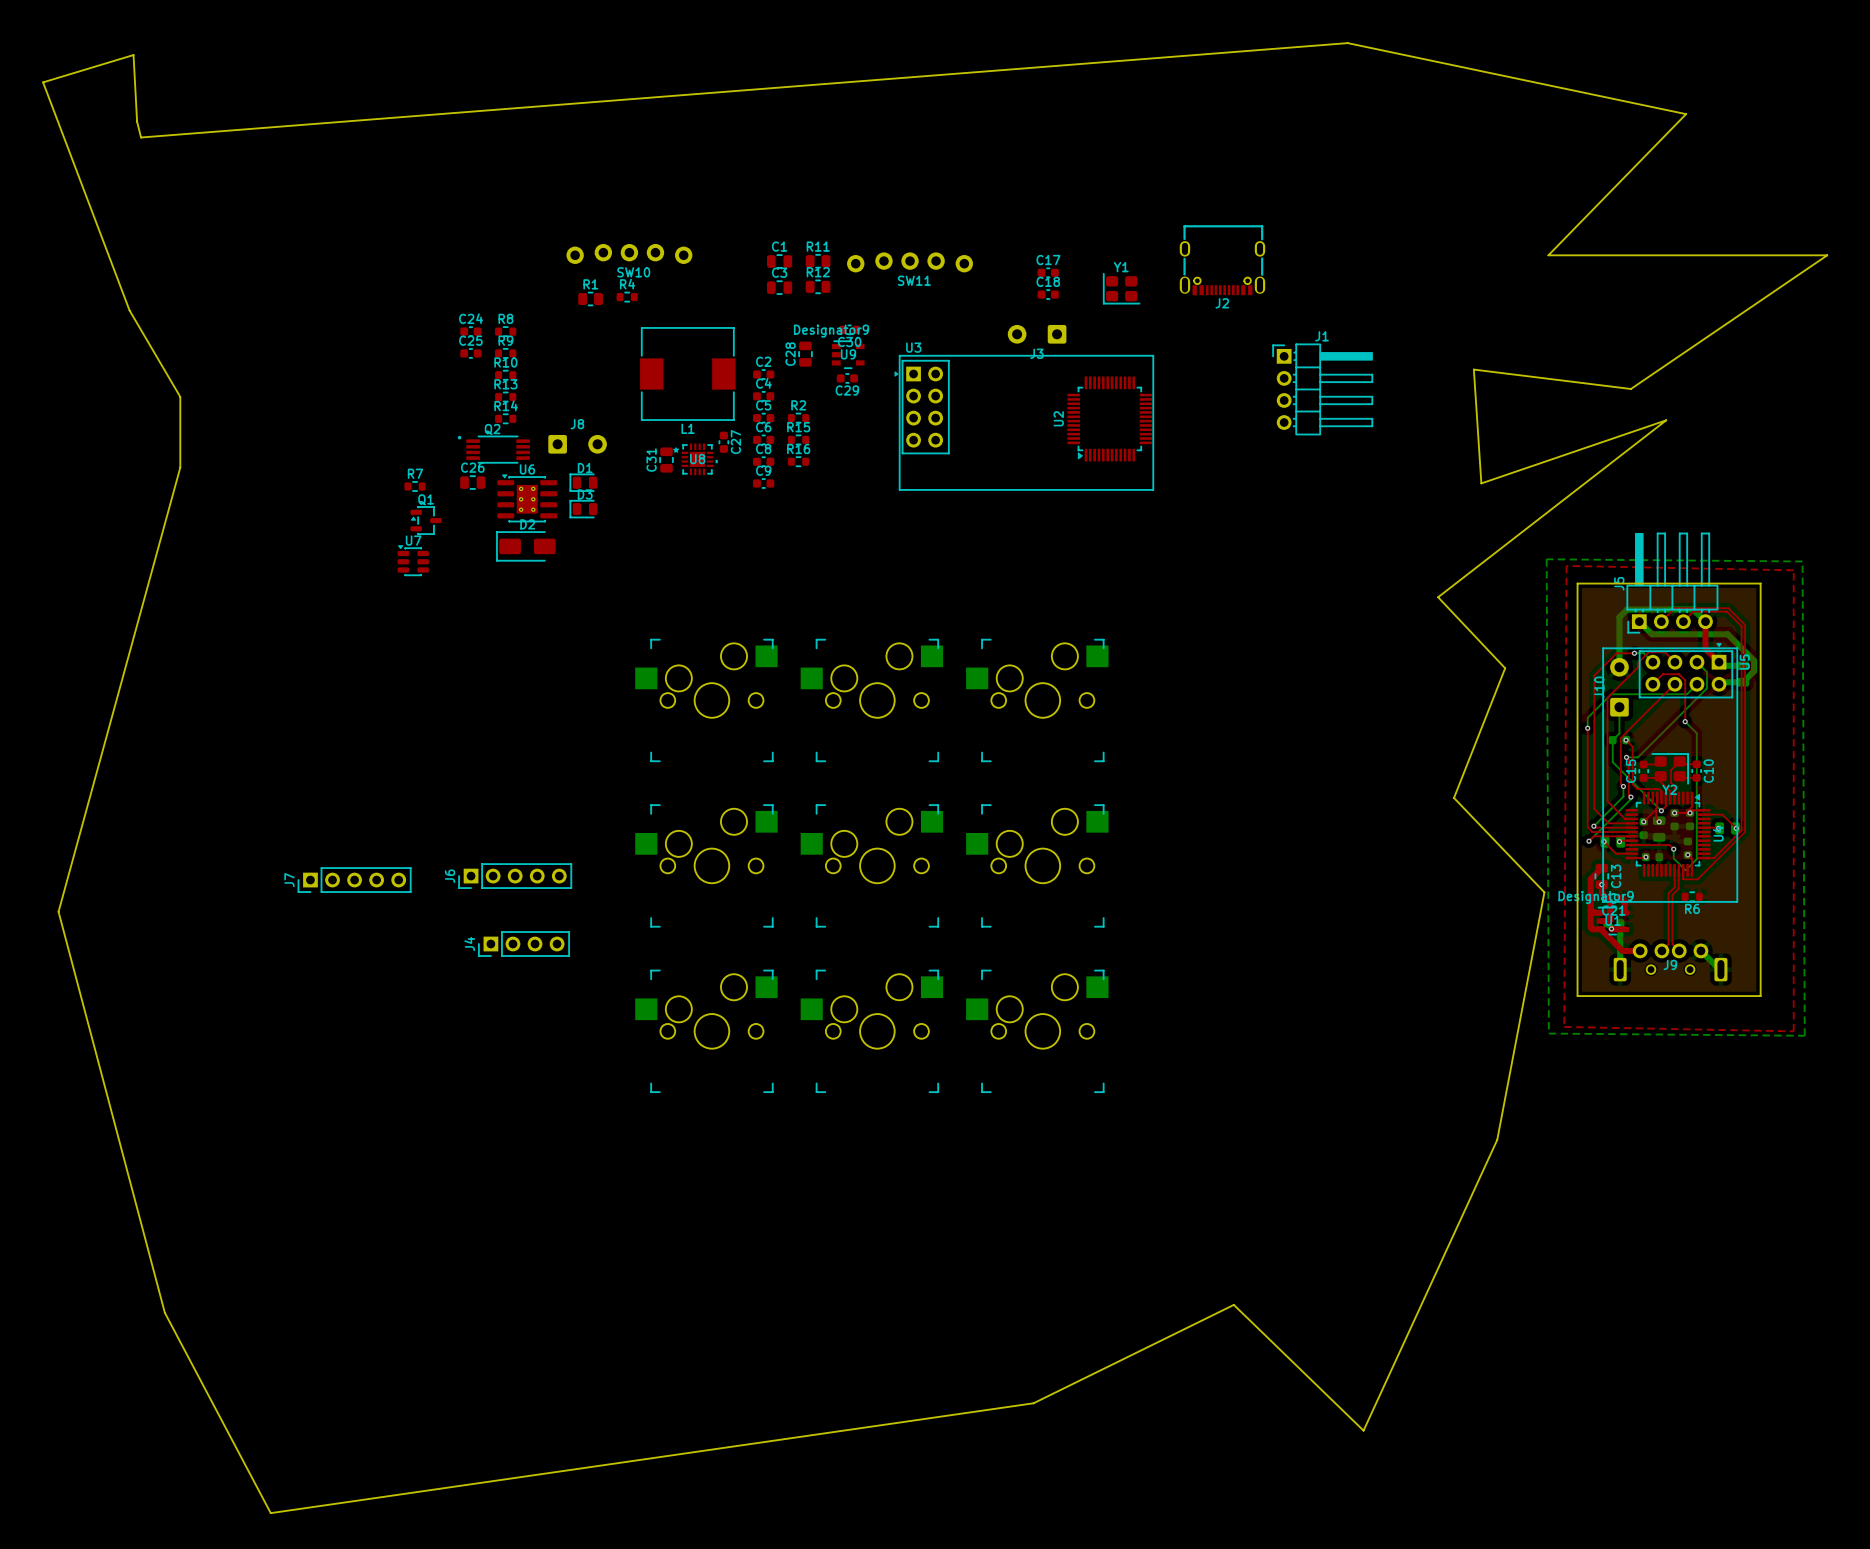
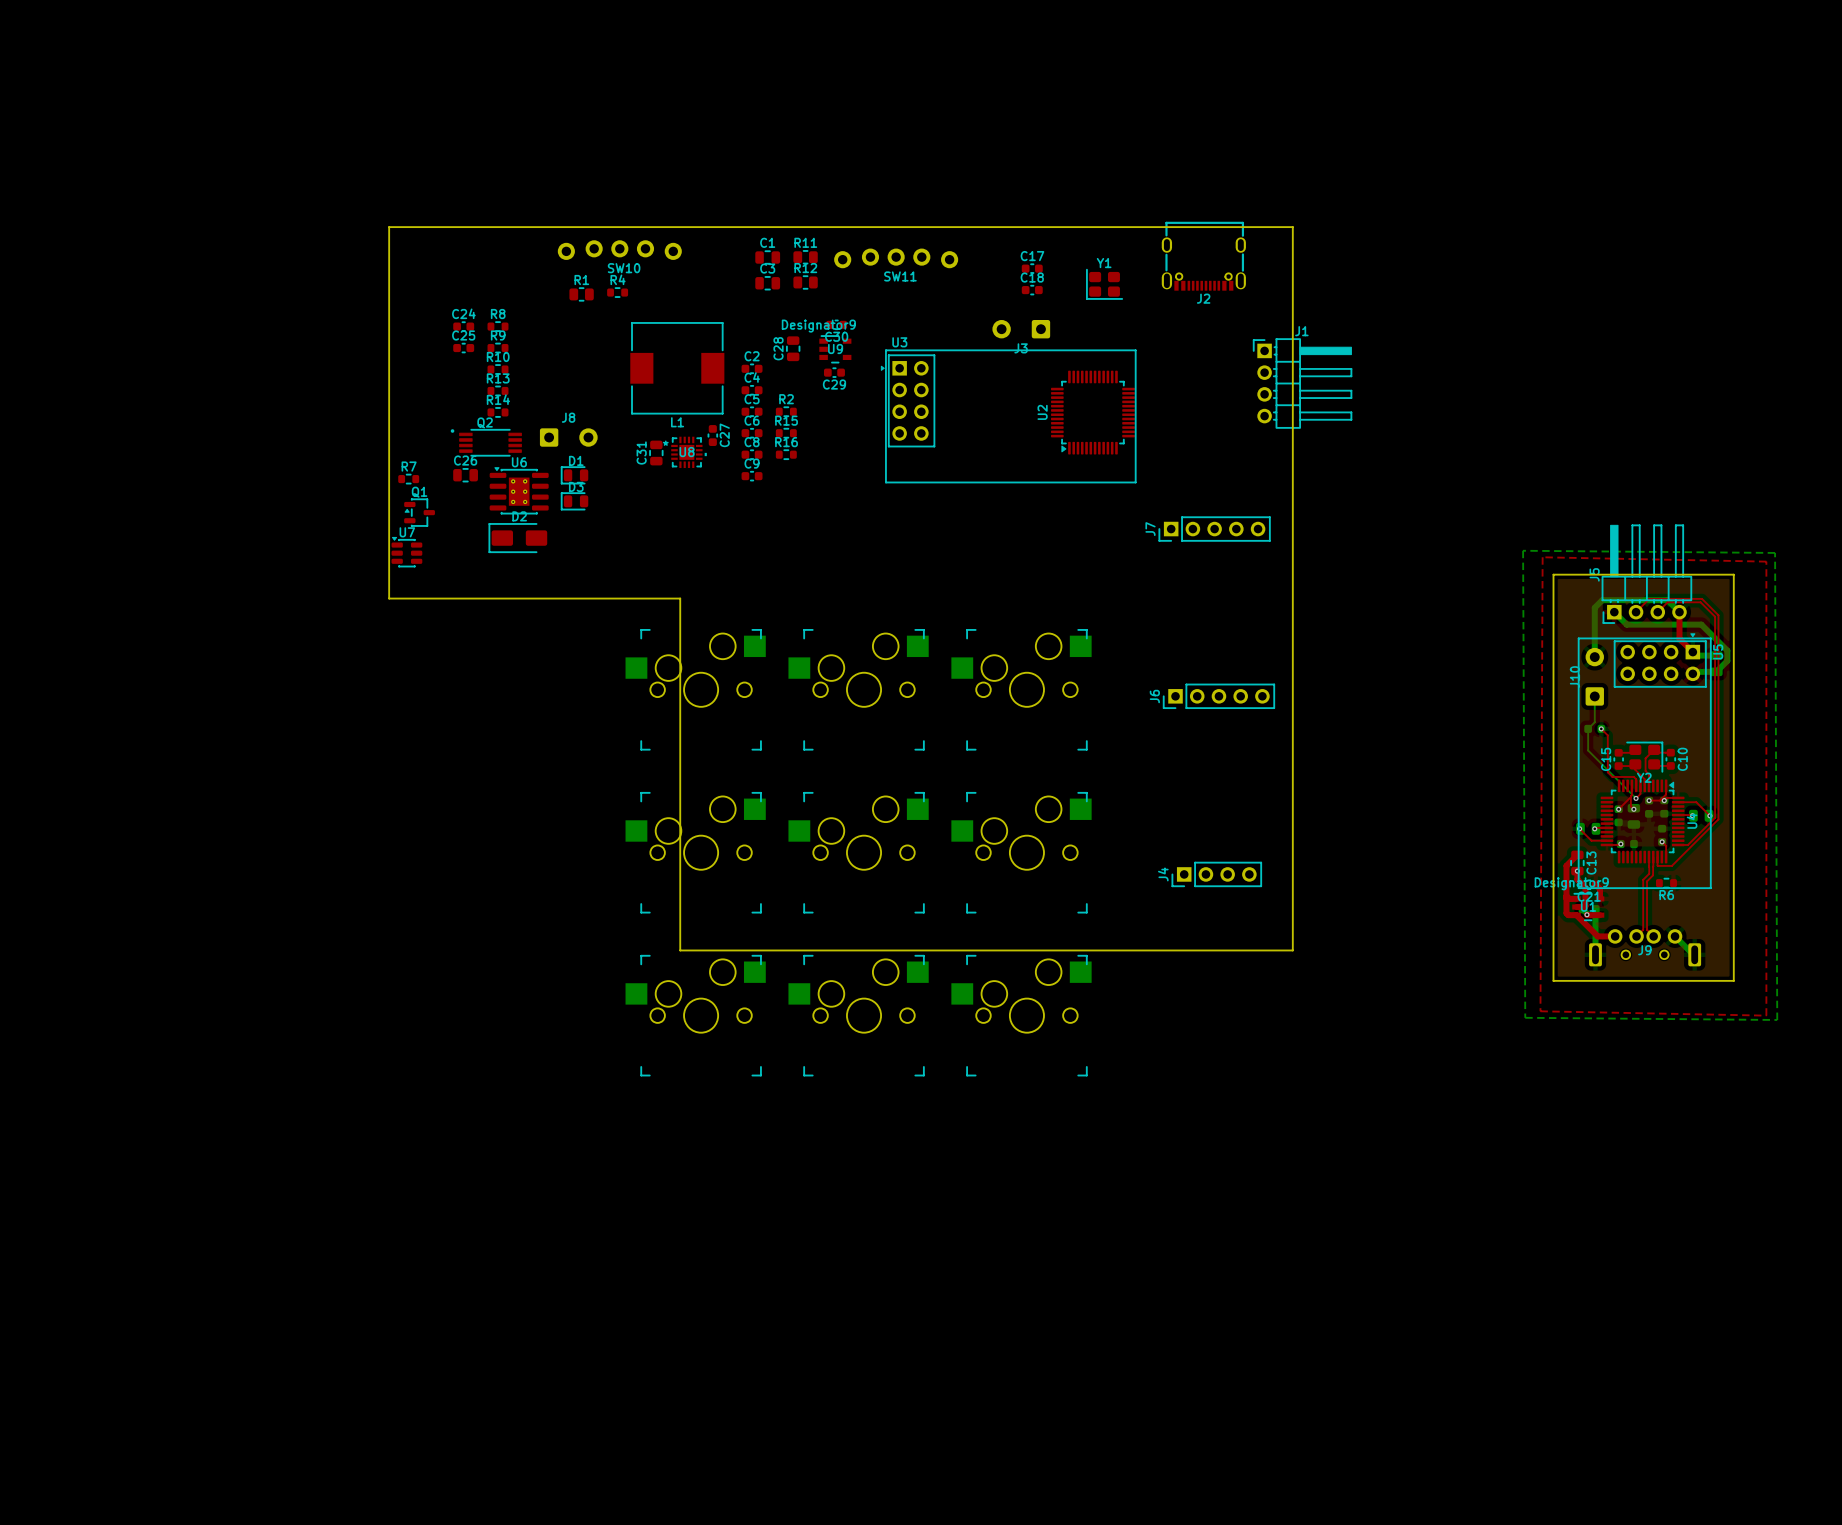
board edge: (1347, 43) (141, 137) (137, 121) (133, 55) (43, 82) (129, 310) (180, 396) (180, 467) (58, 911) (164, 1312) (270, 1513) (1033, 1403) (1233, 1304) (1363, 1430) (1497, 1139) (1544, 892) (1454, 797) (1505, 668) (1438, 597) (1666, 420) (1481, 483) (1473, 369) (1630, 388) (1827, 255) (1548, 255) (1686, 114) (1347, 43) -> none
board edge: none -> (389, 227) (389, 598) (680, 598) (680, 950) (1292, 950) (1292, 227) (389, 227)
top track: (1634, 653) (1616, 653) (1594, 675) (1594, 809) (1608, 823) (1631, 823) -> none
bottom track: (1634, 653) (1643, 653) (1652, 662) -> none
via: (1634, 653) -> none
top track: (1674, 662) (1664, 652) (1648, 652) (1637, 662) (1637, 667) (1607, 697) (1607, 801) (1625, 818) (1631, 818) -> none
bottom track: (1696, 662) (1706, 672) (1706, 688) (1637, 757) (1626, 757) -> none
top track: (1652, 684) (1662, 674) (1679, 674) (1685, 680) (1685, 721) -> none
top track: (1674, 684) (1620, 738) (1620, 783) (1623, 786) -> none
bottom track: (1696, 684) (1686, 694) (1611, 694) (1587, 717) (1587, 728) -> none
bottom track: (1685, 721) (1696, 733) (1696, 859) (1685, 870) (1673, 858) (1673, 849) -> none
via: (1685, 721) -> none
top track: (1587, 728) (1587, 827) (1592, 832) (1631, 832) -> none
via: (1587, 728) -> none
top track: (1626, 757) (1628, 759) (1628, 794) (1630, 797) -> none
via: (1626, 757) -> none
bottom track: (1623, 786) (1623, 796) (1593, 826) -> none
via: (1623, 786) -> none
bottom track: (1630, 797) (1630, 799) (1589, 841) -> none
via: (1630, 797) -> none
top track: (1593, 826) (1631, 827) -> none
via: (1593, 826) -> none
top track: (1631, 836) (1593, 836) (1589, 841) -> none
via: (1589, 841) -> none
top track: (1631, 845) (1669, 845) (1673, 849) -> none
via: (1673, 849) -> none
J6 position: (515, 876) -> (1218, 696)
J7 position: (354, 880) -> (1214, 529)
J4 position: (524, 944) -> (1216, 874)

